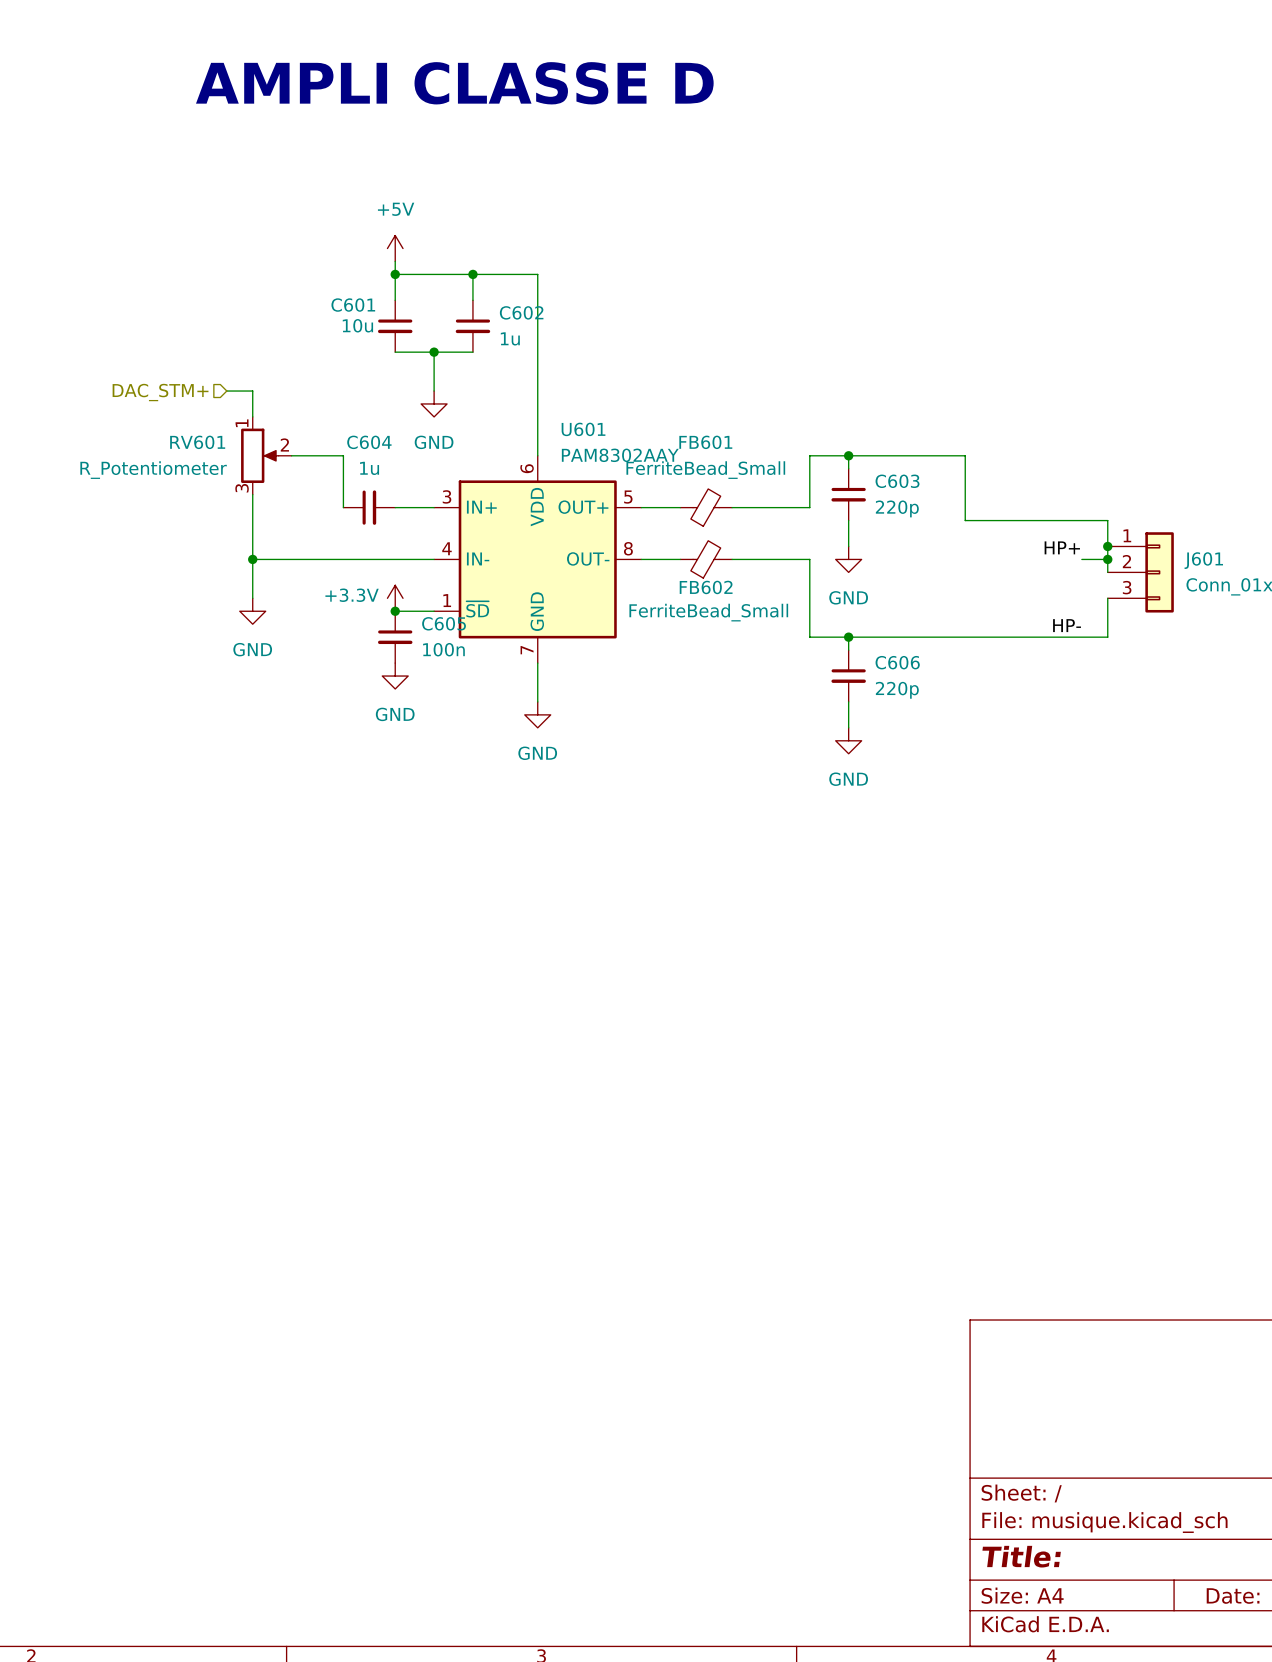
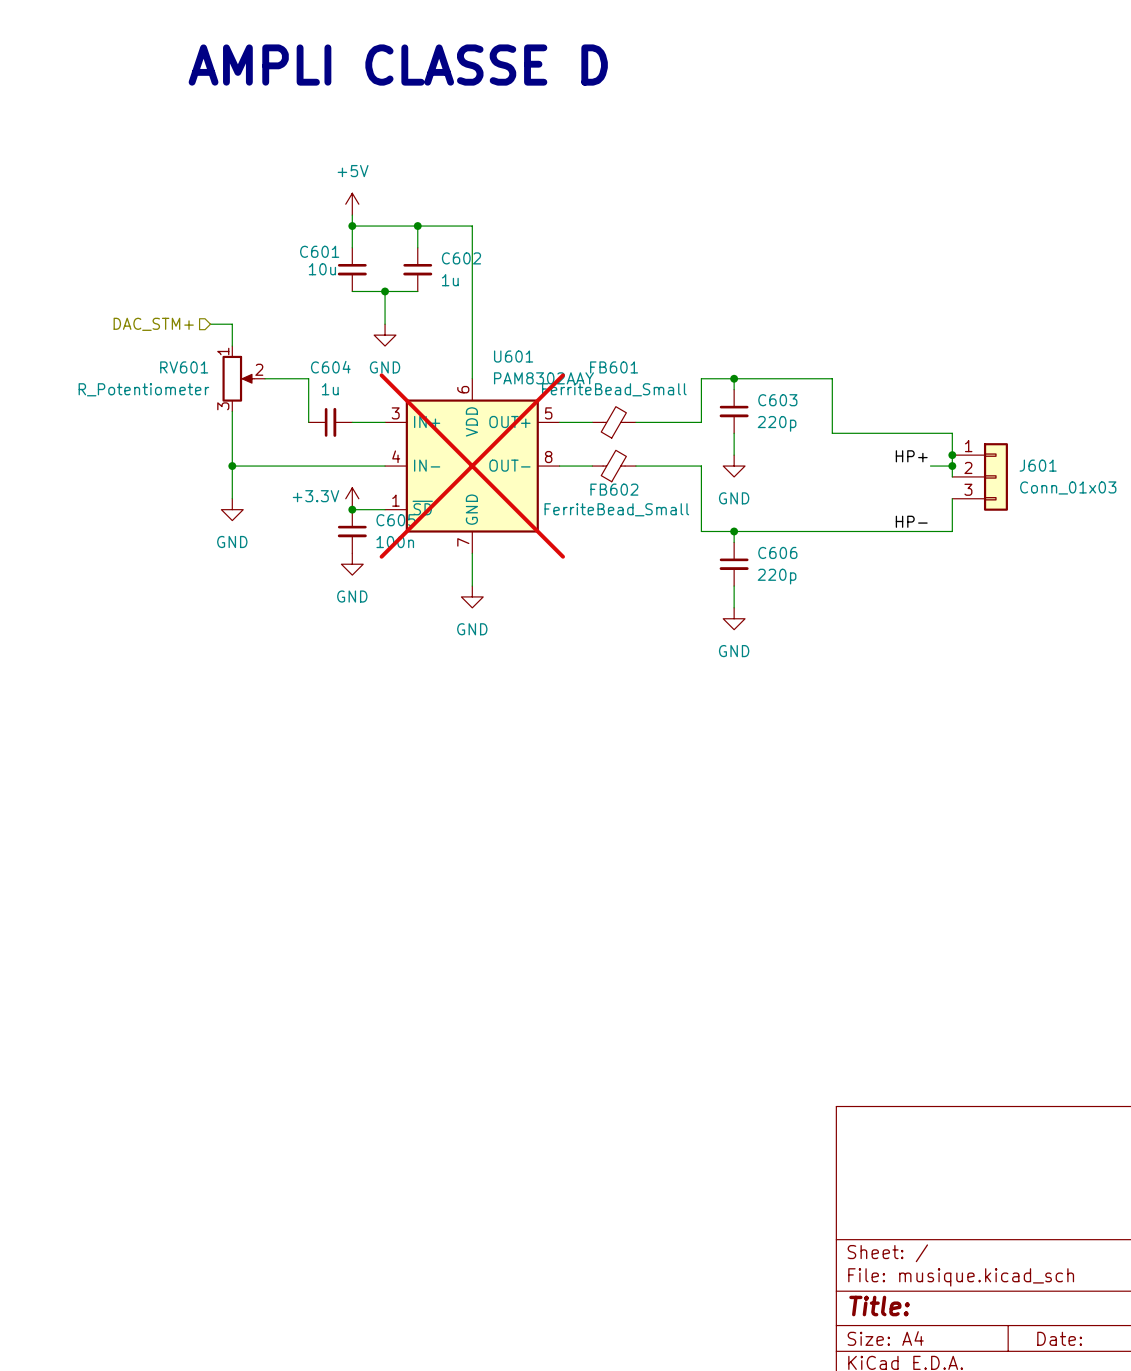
U601 do-not-place cross: none -> (472, 466)

